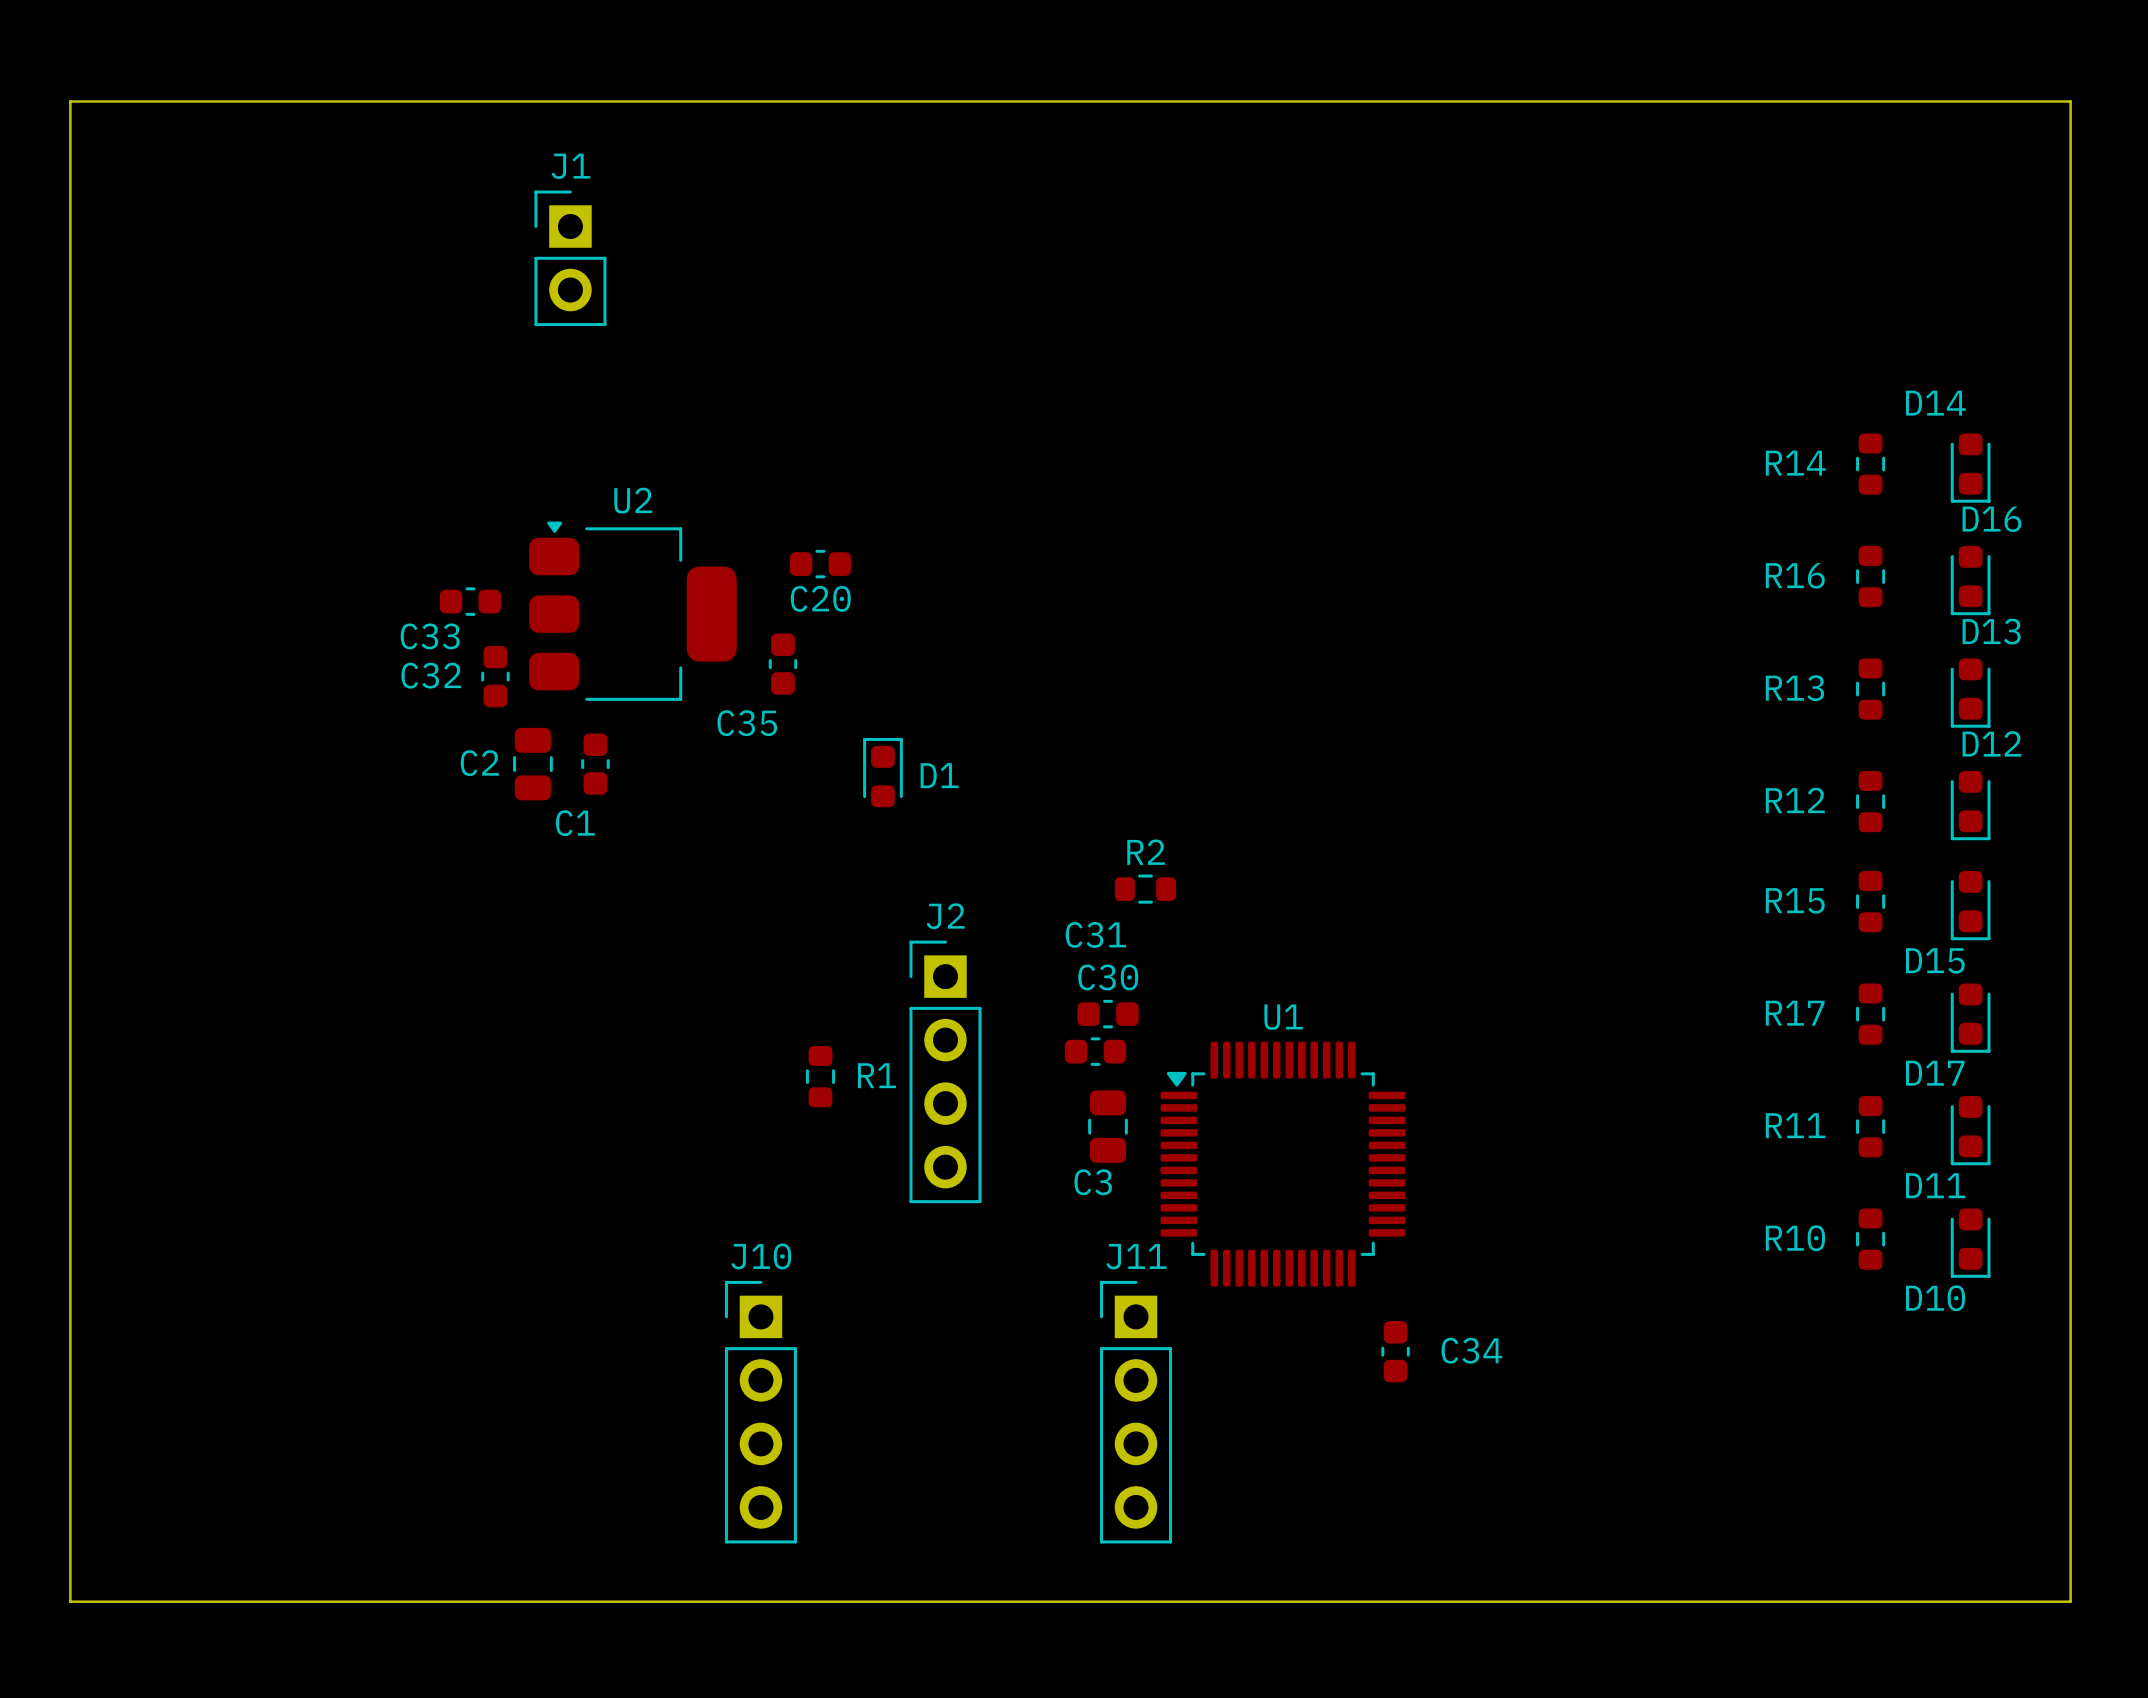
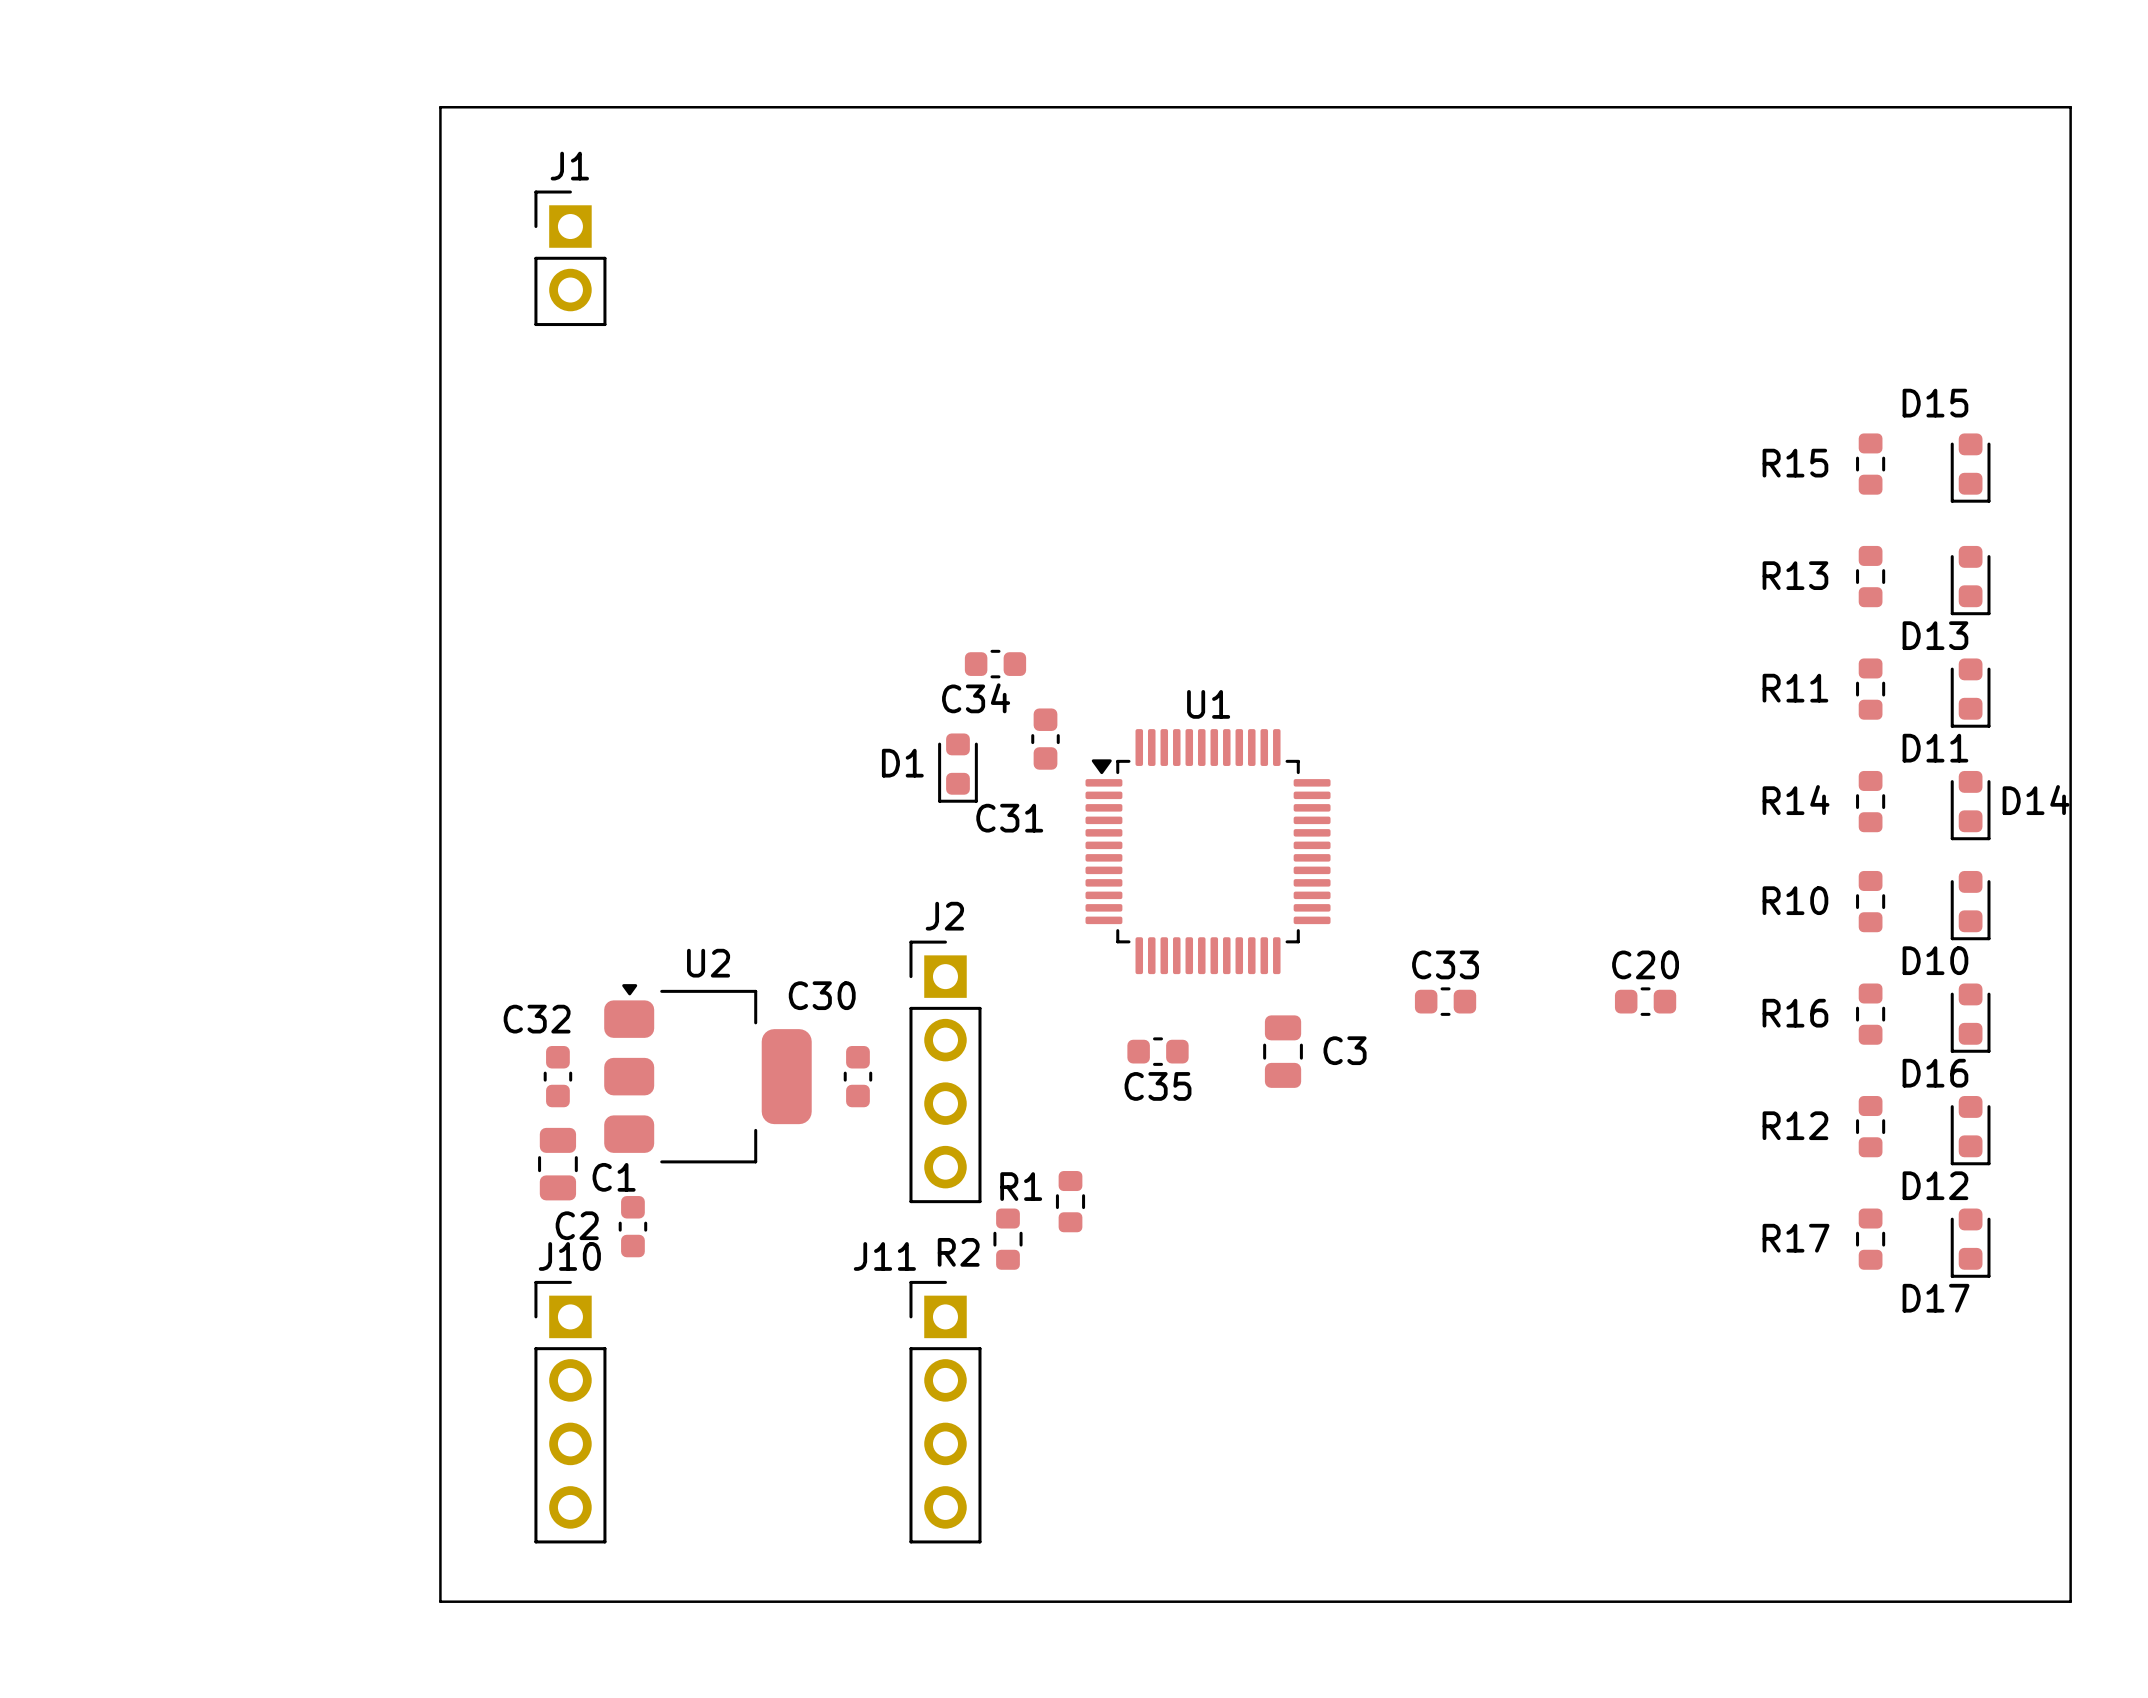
board edge: (2070, 107) (2070, 101) (70, 101) (70, 1601) (440, 1601) -> (2070, 107) (440, 107) (440, 1601)
D14 name: D14 (1935, 403) -> D15 (1935, 403)
R14 name: R14 (1795, 463) -> R15 (1795, 463)
D16 name: D16 (1991, 519) -> D13 (1935, 635)
C20 position: (820, 564) -> (1645, 1001)
R16 name: R16 (1795, 575) -> R13 (1795, 575)
C20 name position: C20 (820, 598) -> C20 (1645, 964)
C33 position: (470, 601) -> (1445, 1001)
U2 position: (632, 611) -> (707, 1073)
D13 name: D13 (1991, 631) -> D11 (1935, 748)
C33 name position: C33 (430, 636) -> C33 (1445, 964)
C35 rotation: 0° (782, 664) -> 90° clockwise (1158, 1051)
C35 position: (782, 664) -> (1158, 1051)
C32 name position: C32 (431, 675) -> C32 (537, 1019)
C32 position: (495, 676) -> (557, 1076)
R13 name: R13 (1794, 688) -> R11 (1795, 688)
D12 name: D12 (1992, 743) -> D14 (2036, 800)
C2 name position: C2 (479, 763) -> C2 (577, 1225)
C1 position: (532, 764) -> (557, 1164)
C2 position: (595, 764) -> (632, 1226)
D1 rotation: 0° (882, 772) -> 180° (957, 768)
D1 position: (882, 772) -> (957, 768)
R12 name: R12 (1795, 800) -> R14 (1796, 800)
C1 name position: C1 (575, 823) -> C1 (614, 1177)
R2 name position: R2 (1145, 852) -> R2 (958, 1252)
R2 rotation: 0° (1145, 889) -> 90° clockwise (1007, 1239)
R2 position: (1145, 889) -> (1007, 1239)
R15 name: R15 (1795, 900) -> R10 (1795, 900)
C31 name position: C31 (1095, 934) -> C31 (1009, 818)
D15 name: D15 (1935, 960) -> D10 (1935, 960)
C30 name position: C30 (1108, 977) -> C30 (822, 995)
R17 name: R17 (1795, 1013) -> R16 (1795, 1013)
C30 rotation: 0° (1108, 1014) -> 90° clockwise (857, 1076)
C30 position: (1108, 1014) -> (857, 1076)
C31 rotation: 0° (1095, 1051) -> 90° clockwise (1045, 739)
C31 position: (1095, 1051) -> (1045, 739)
D17 name: D17 (1935, 1073) -> D16 (1935, 1073)
R1 name position: R1 (877, 1075) -> R1 (1021, 1186)
R1 position: (820, 1076) -> (1070, 1201)
R11 name: R11 (1795, 1125) -> R12 (1795, 1125)
C3 position: (1108, 1126) -> (1283, 1051)
U1 position: (1283, 1164) -> (1208, 851)
C3 name position: C3 (1093, 1182) -> C3 (1345, 1050)
D11 name: D11 (1935, 1185) -> D12 (1935, 1185)
R10 name: R10 (1795, 1238) -> R17 (1796, 1238)
J11 name position: J11 (1136, 1256) -> J11 (884, 1256)
D10 name: D10 (1935, 1298) -> D17 (1936, 1298)
C34 rotation: 0° (1395, 1351) -> 90° clockwise (995, 664)
C34 position: (1395, 1351) -> (995, 664)
J10 position: (760, 1412) -> (570, 1412)
J11 position: (1136, 1412) -> (945, 1412)

